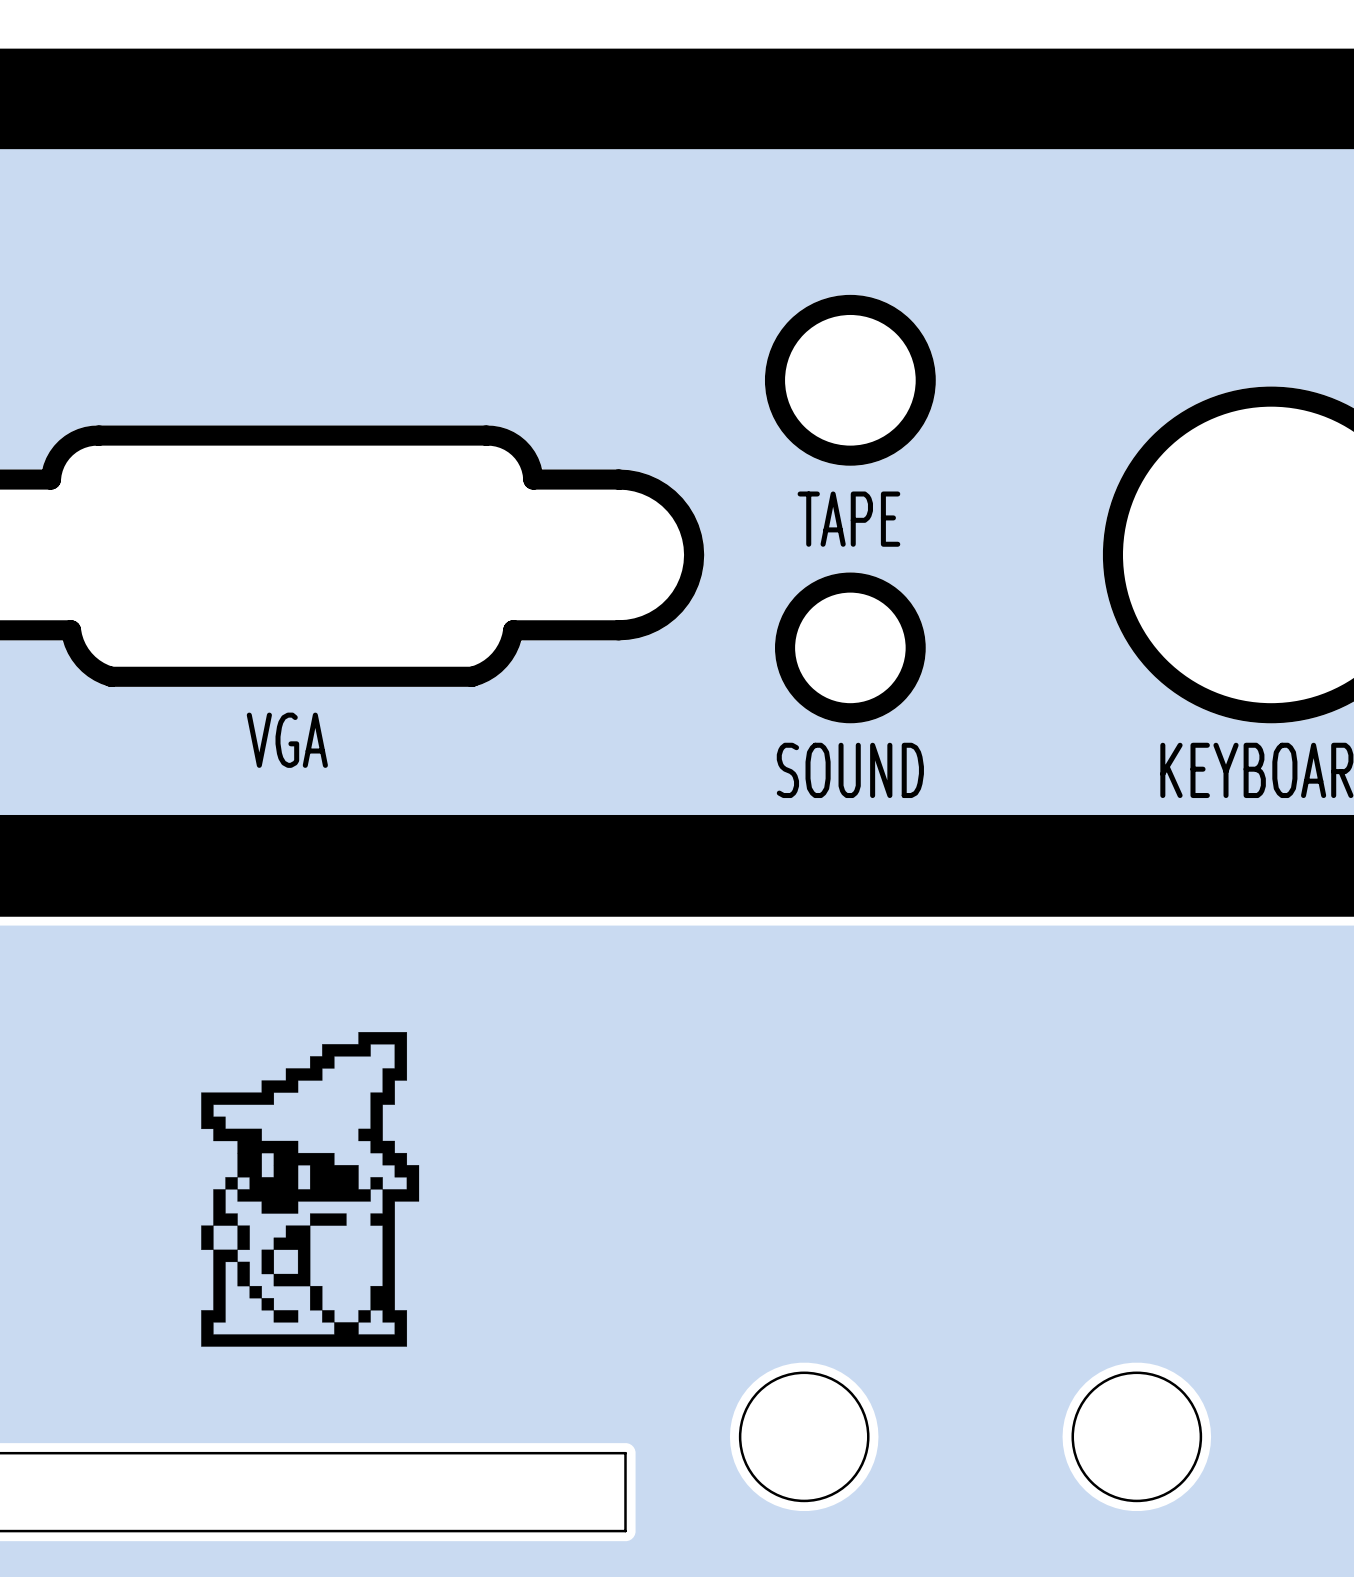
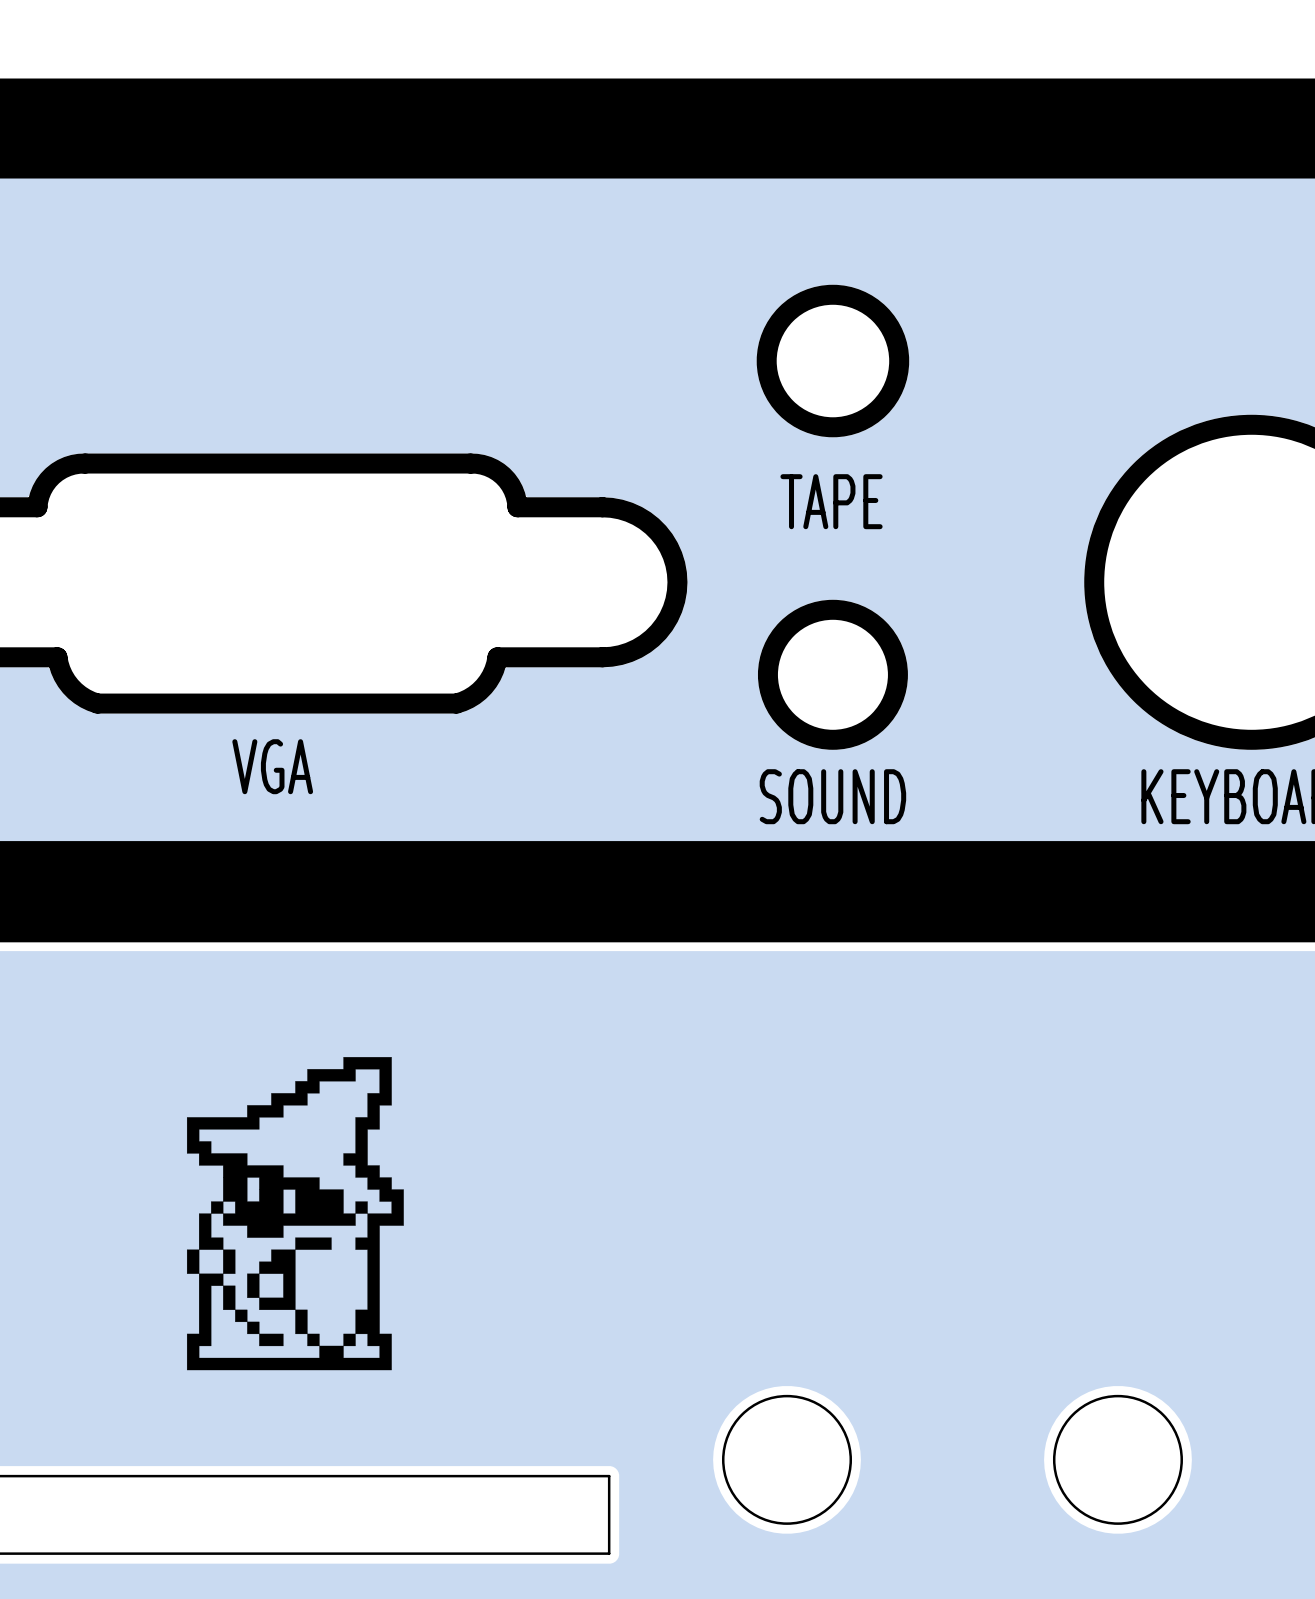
drawing: none -> [756, 284, 910, 438]
drawing: [764, 294, 936, 466] -> none
text position: TAPE (848, 519) -> TAPE (831, 501)

